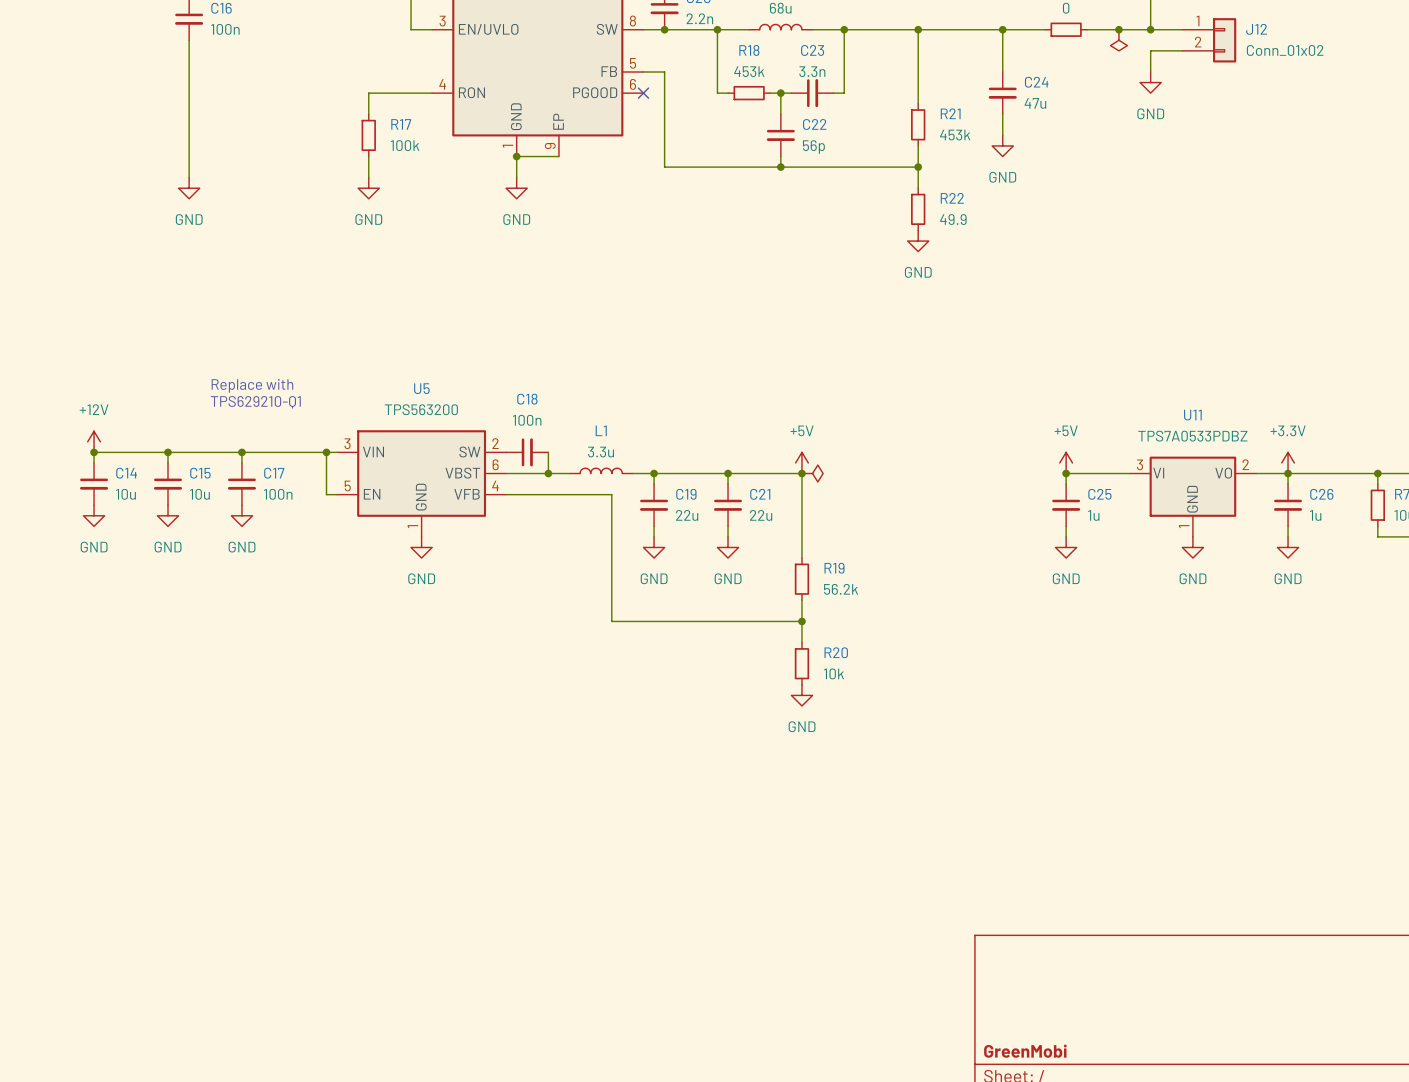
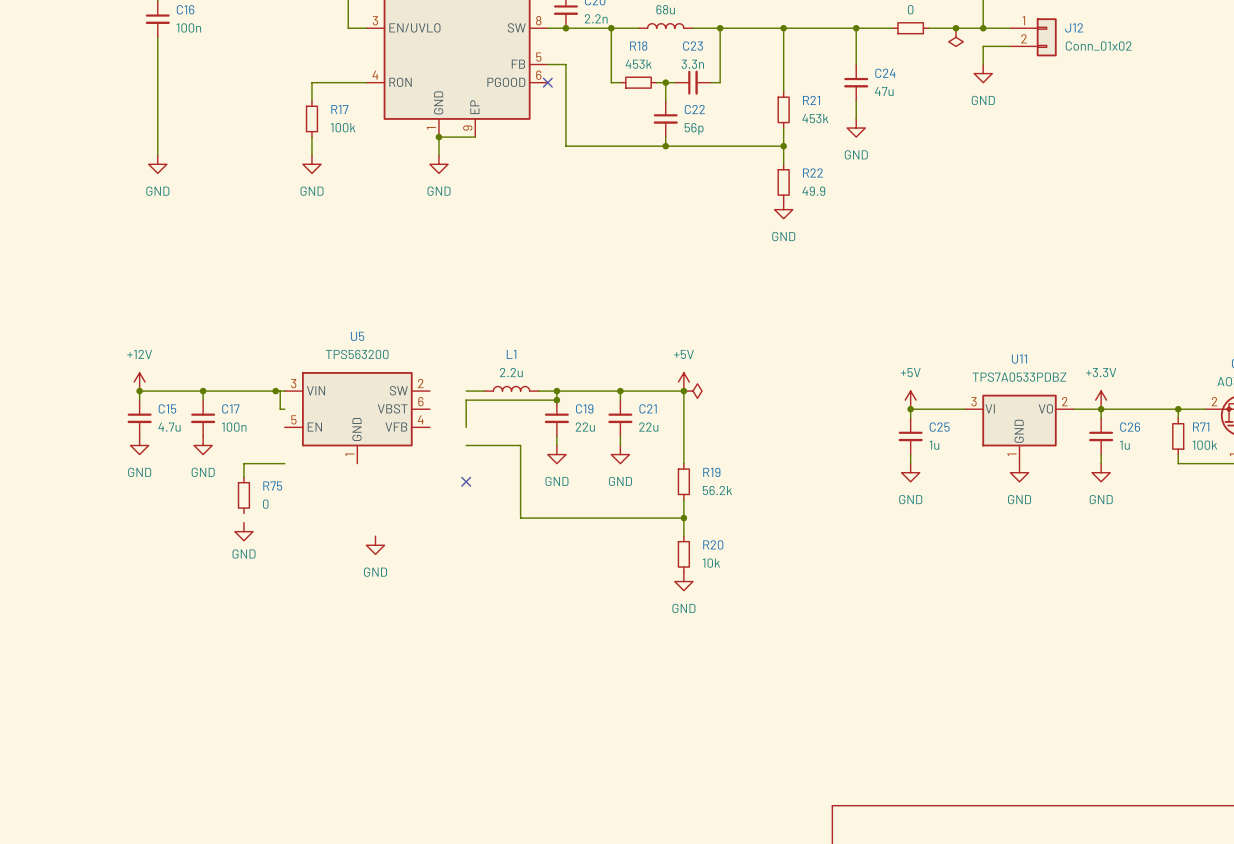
text: Replace with (252, 385) -> none
text: TPS629210-Q1 (255, 402) -> none
power symbol position: +12V (94, 441) -> +12V (139, 382)
junction: (94, 452) -> none
wire: (167, 452) (94, 452) (94, 462) -> none
wire: (326, 452) (326, 494) (337, 494) -> none
wire: none -> (280, 391) (280, 409) (284, 409)
C18: 100n (527, 452) -> none
wire: (548, 452) (548, 462) -> (466, 391) (484, 391)
L1 value: 3.3u (601, 452) -> 2.2u (511, 372)
wire: none -> (556, 391) (556, 400) (466, 400)
junction: none -> (556, 391)
junction: none -> (556, 400)
power symbol position: +5V (801, 462) -> +5V (683, 382)
L1 position: (601, 470) -> (511, 388)
wire: (506, 473) (569, 473) -> none
wire: none -> (466, 409) (466, 427)
junction: (548, 473) -> none
wire: (632, 473) (801, 473) -> (538, 391) (683, 391) (683, 409)
junction: (654, 473) -> none
junction position: (728, 473) -> (620, 391)
junction position: (801, 473) -> (683, 391)
power symbol position: (812, 473) -> (692, 391)
C14: 10u (94, 484) -> none
C15 value: 10u (199, 494) -> 4.7u (169, 427)
wire: (506, 494) (611, 494) (611, 515) -> (466, 445) (520, 445)
C19 position: (654, 505) -> (556, 418)
C21 position: (728, 505) -> (620, 418)
power symbol: GND (94, 515) -> none
wire: none -> (284, 463) (243, 463) (243, 477)
wire: (801, 536) (801, 558) -> none
power symbol: GND (421, 547) -> none
power symbol position: GND (654, 547) -> GND (556, 454)
power symbol position: GND (728, 547) -> GND (620, 454)
no-connect mark: none -> (466, 481)
R75: none -> 0 (243, 495)
R19 position: (801, 579) -> (683, 481)
wire: (611, 600) (611, 621) (801, 621) (801, 642) -> (520, 518) (683, 518) (683, 499)
power symbol: none -> GND (243, 531)
junction position: (801, 621) -> (683, 518)
power symbol: none -> GND (375, 545)
R20 position: (801, 663) -> (683, 554)
power symbol position: GND (801, 695) -> GND (683, 581)

